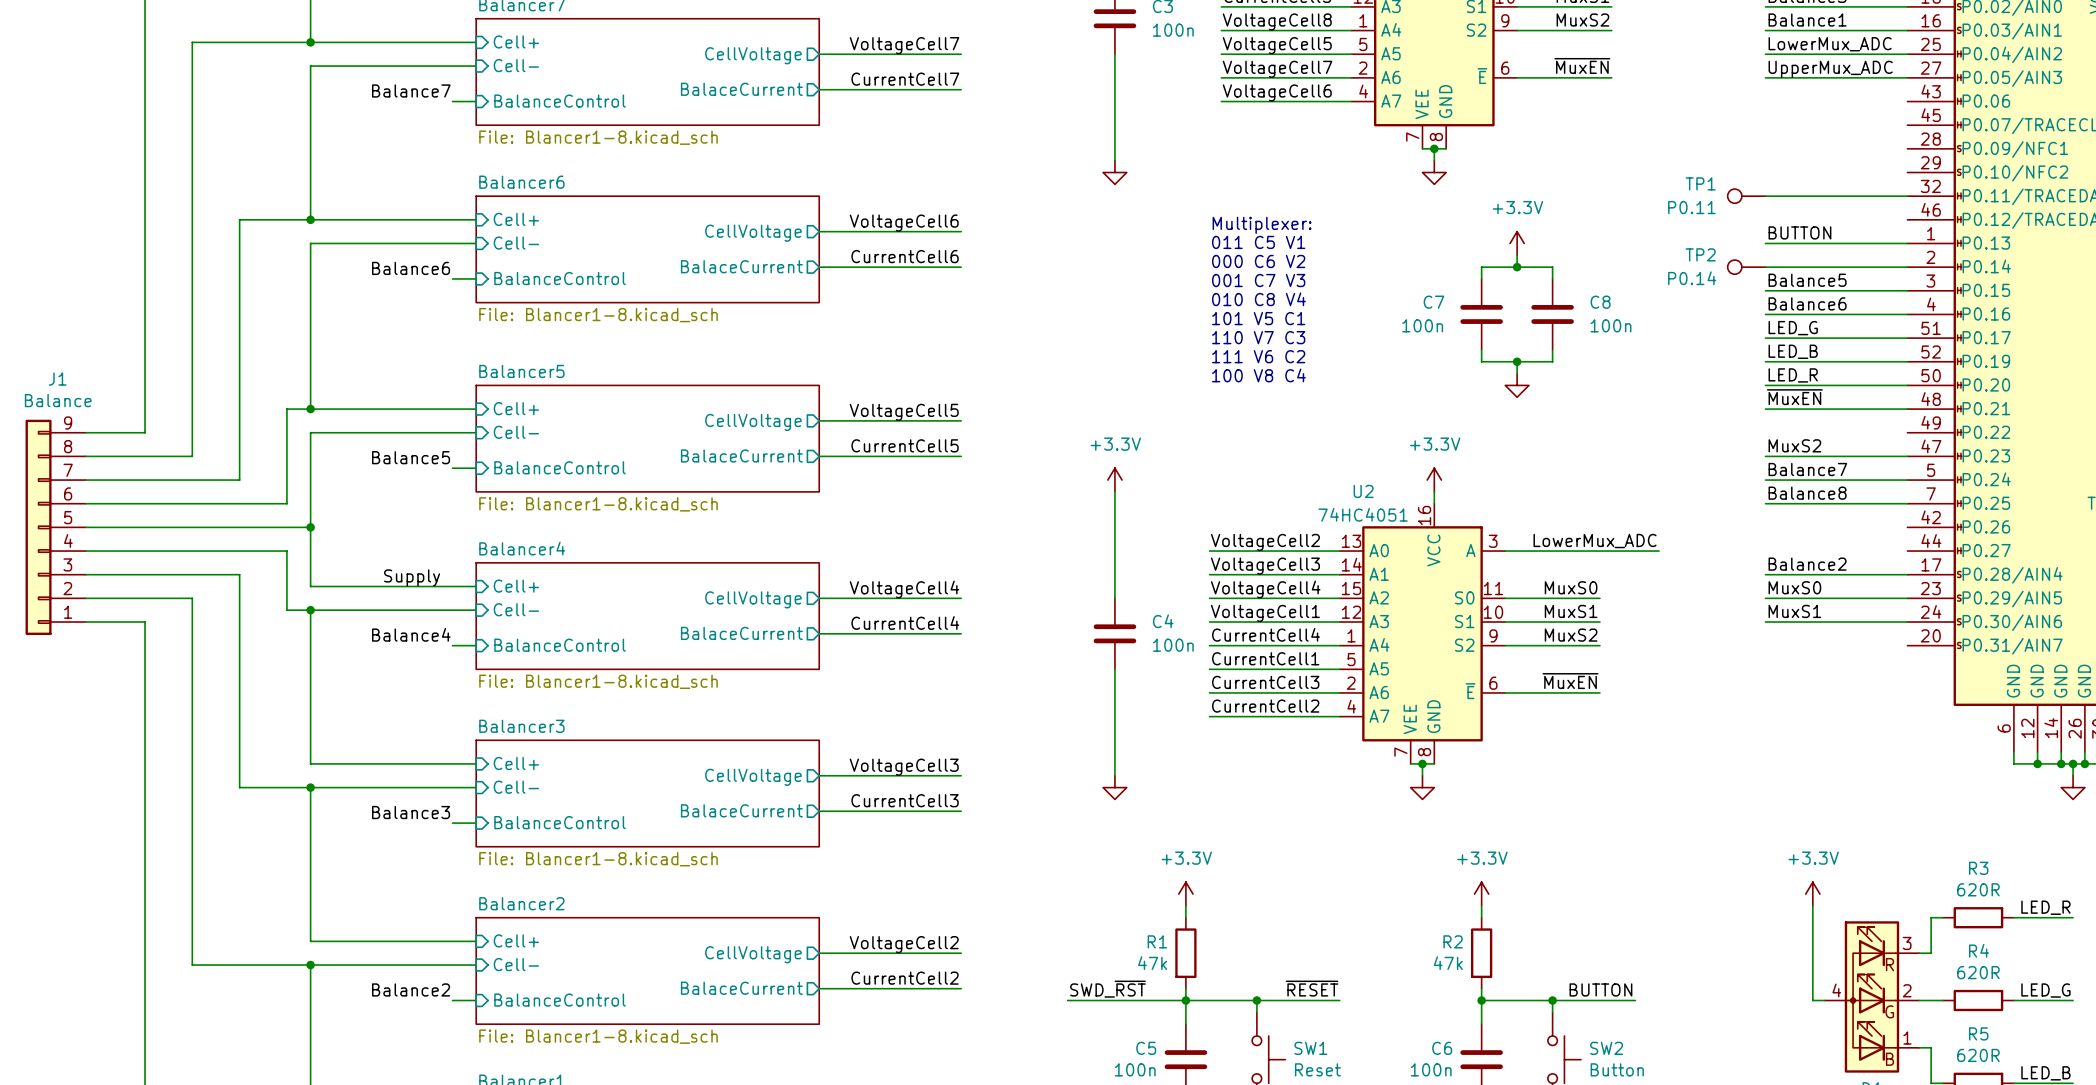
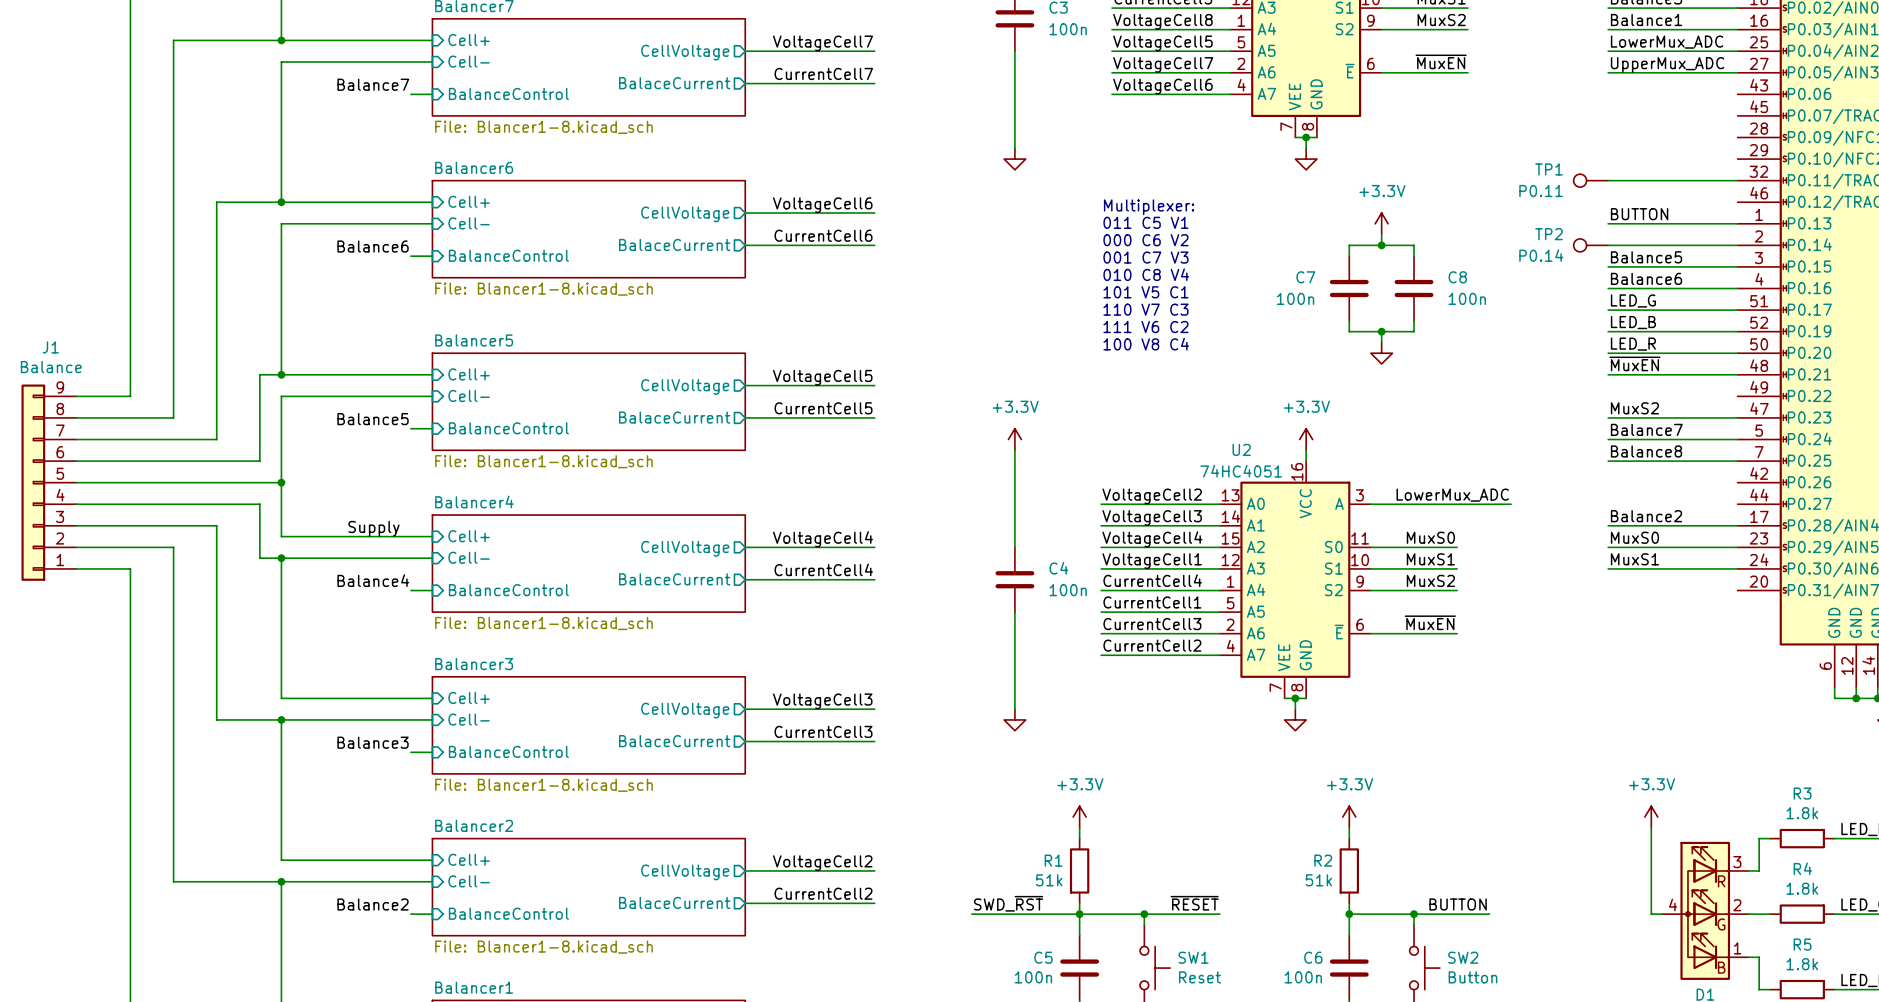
R3 value: 620R (1978, 889) -> 1.8k (1802, 813)
R1 value: 47k (1152, 963) -> 51k (1049, 880)
R2 value: 47k (1448, 963) -> 51k (1318, 880)
R4 value: 620R (1978, 972) -> 1.8k (1802, 888)
R5 value: 620R (1978, 1055) -> 1.8k (1802, 964)

